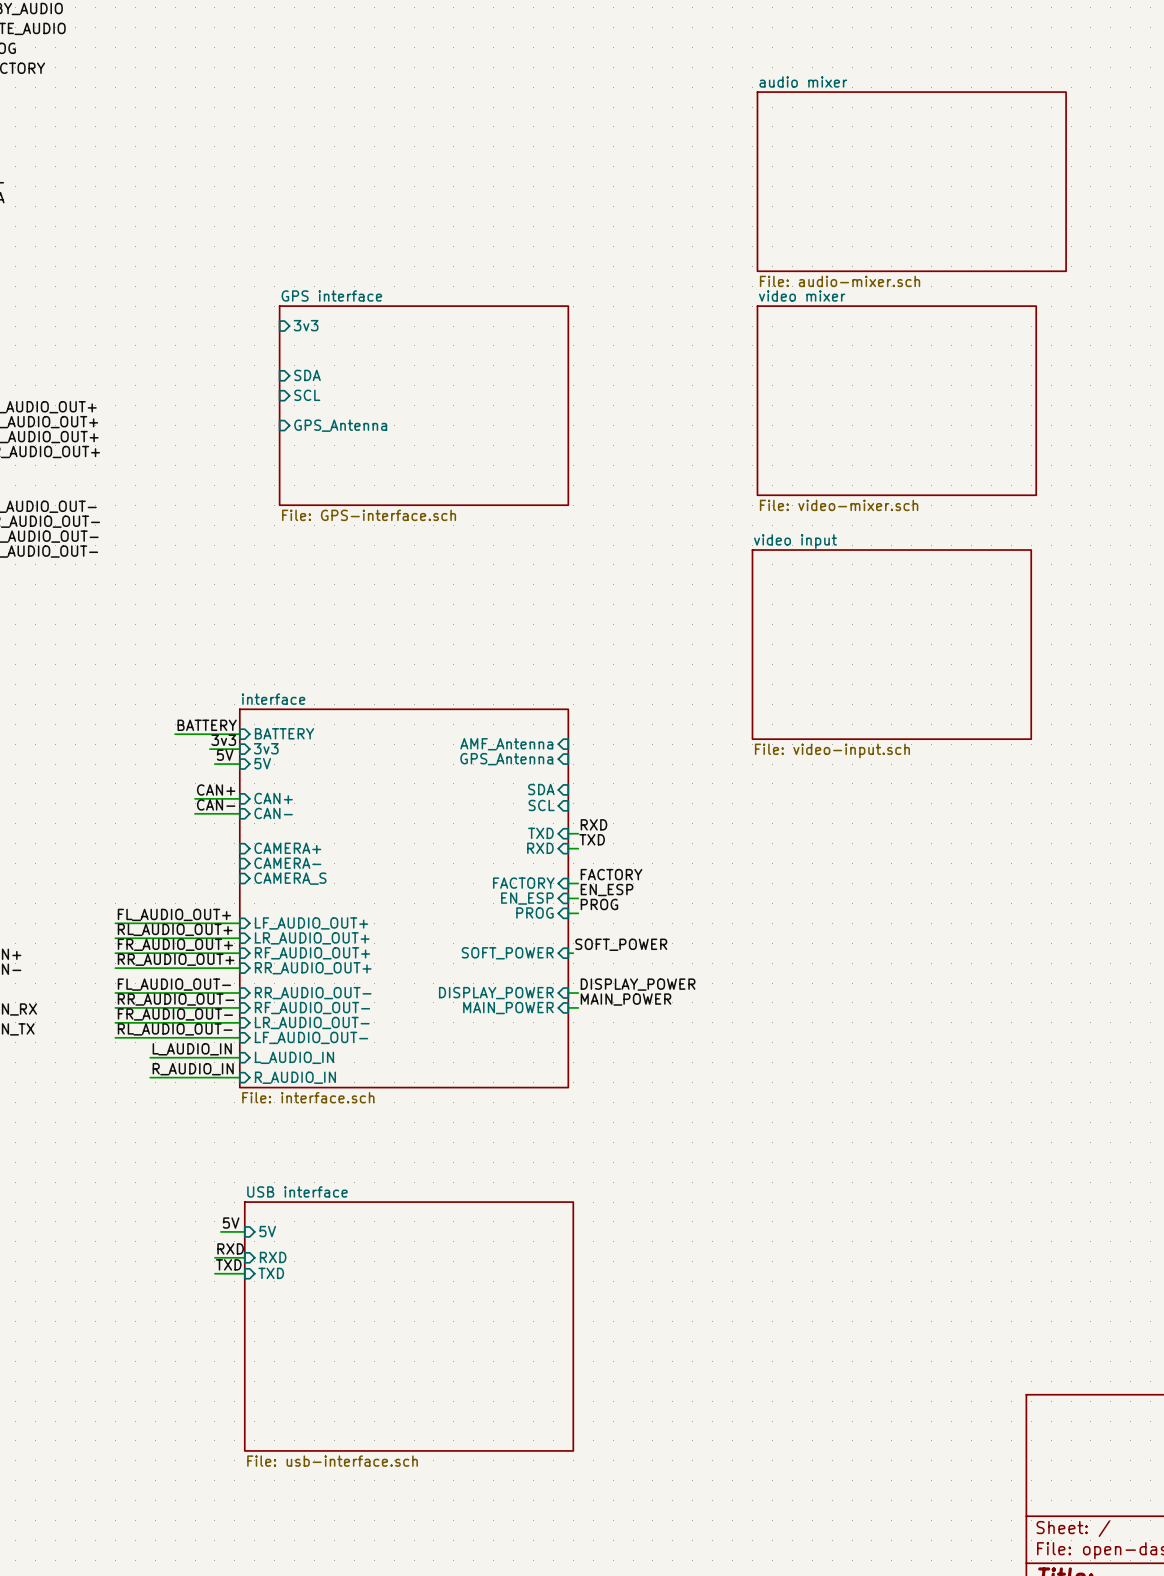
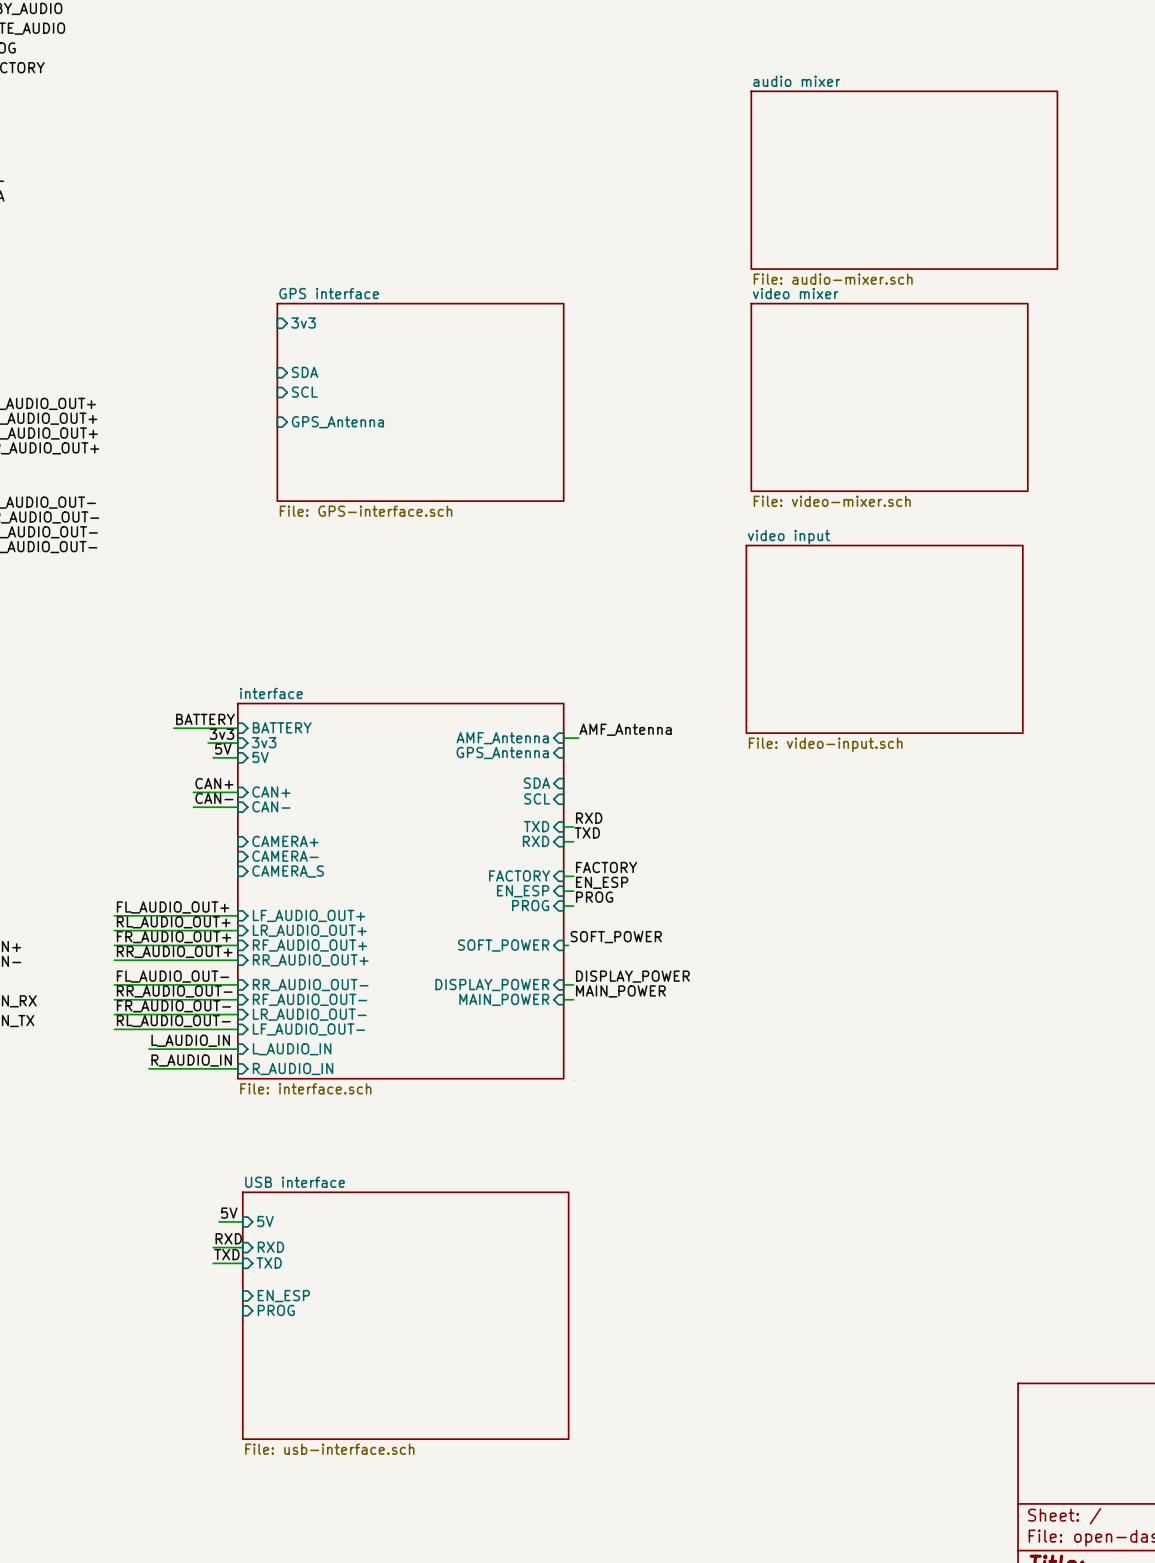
label: none -> AMF_Antenna (625, 729)
wire: none -> (563, 738) (578, 738)
sheet pin: none -> EN_ESP (283, 1296)
sheet pin: none -> PROG (276, 1310)

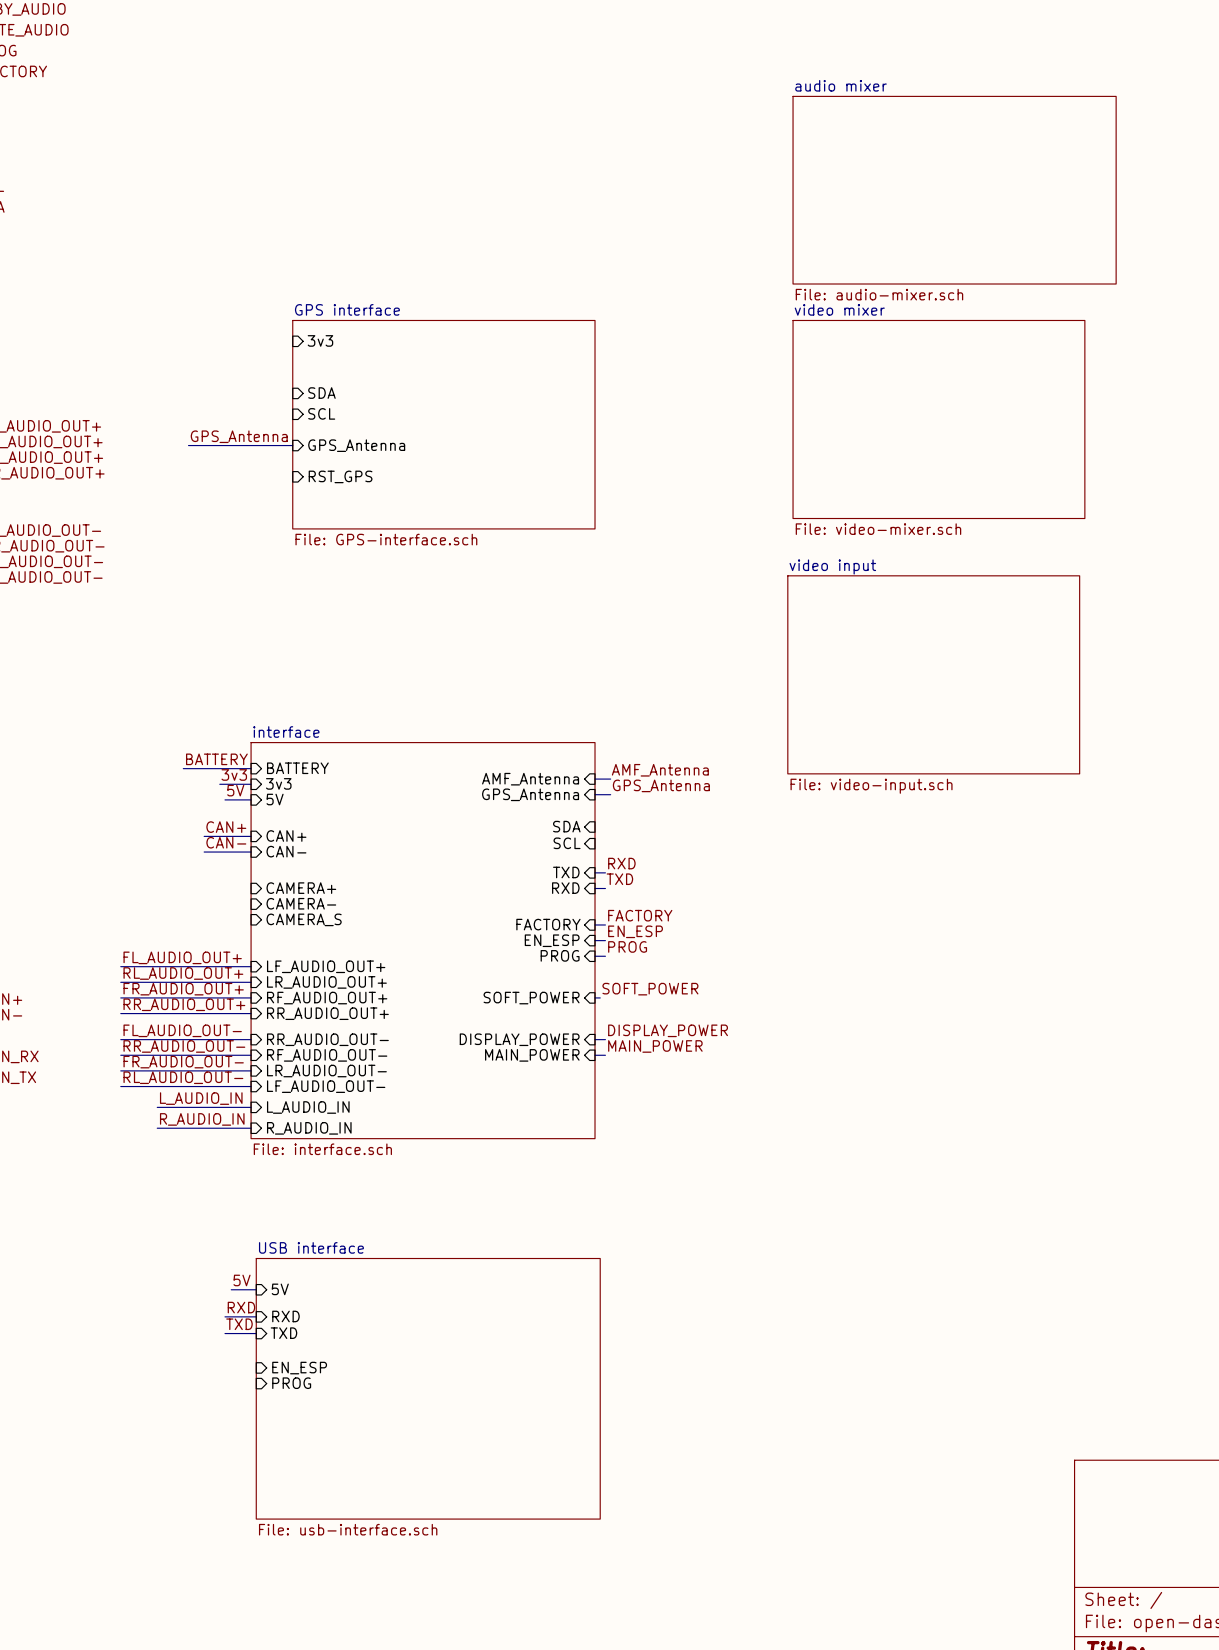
label: none -> GPS_Antenna (239, 436)
wire: none -> (188, 445) (292, 445)
sheet pin: none -> RST_GPS (340, 476)
label: none -> GPS_Antenna (661, 785)
wire: none -> (595, 794) (610, 794)

